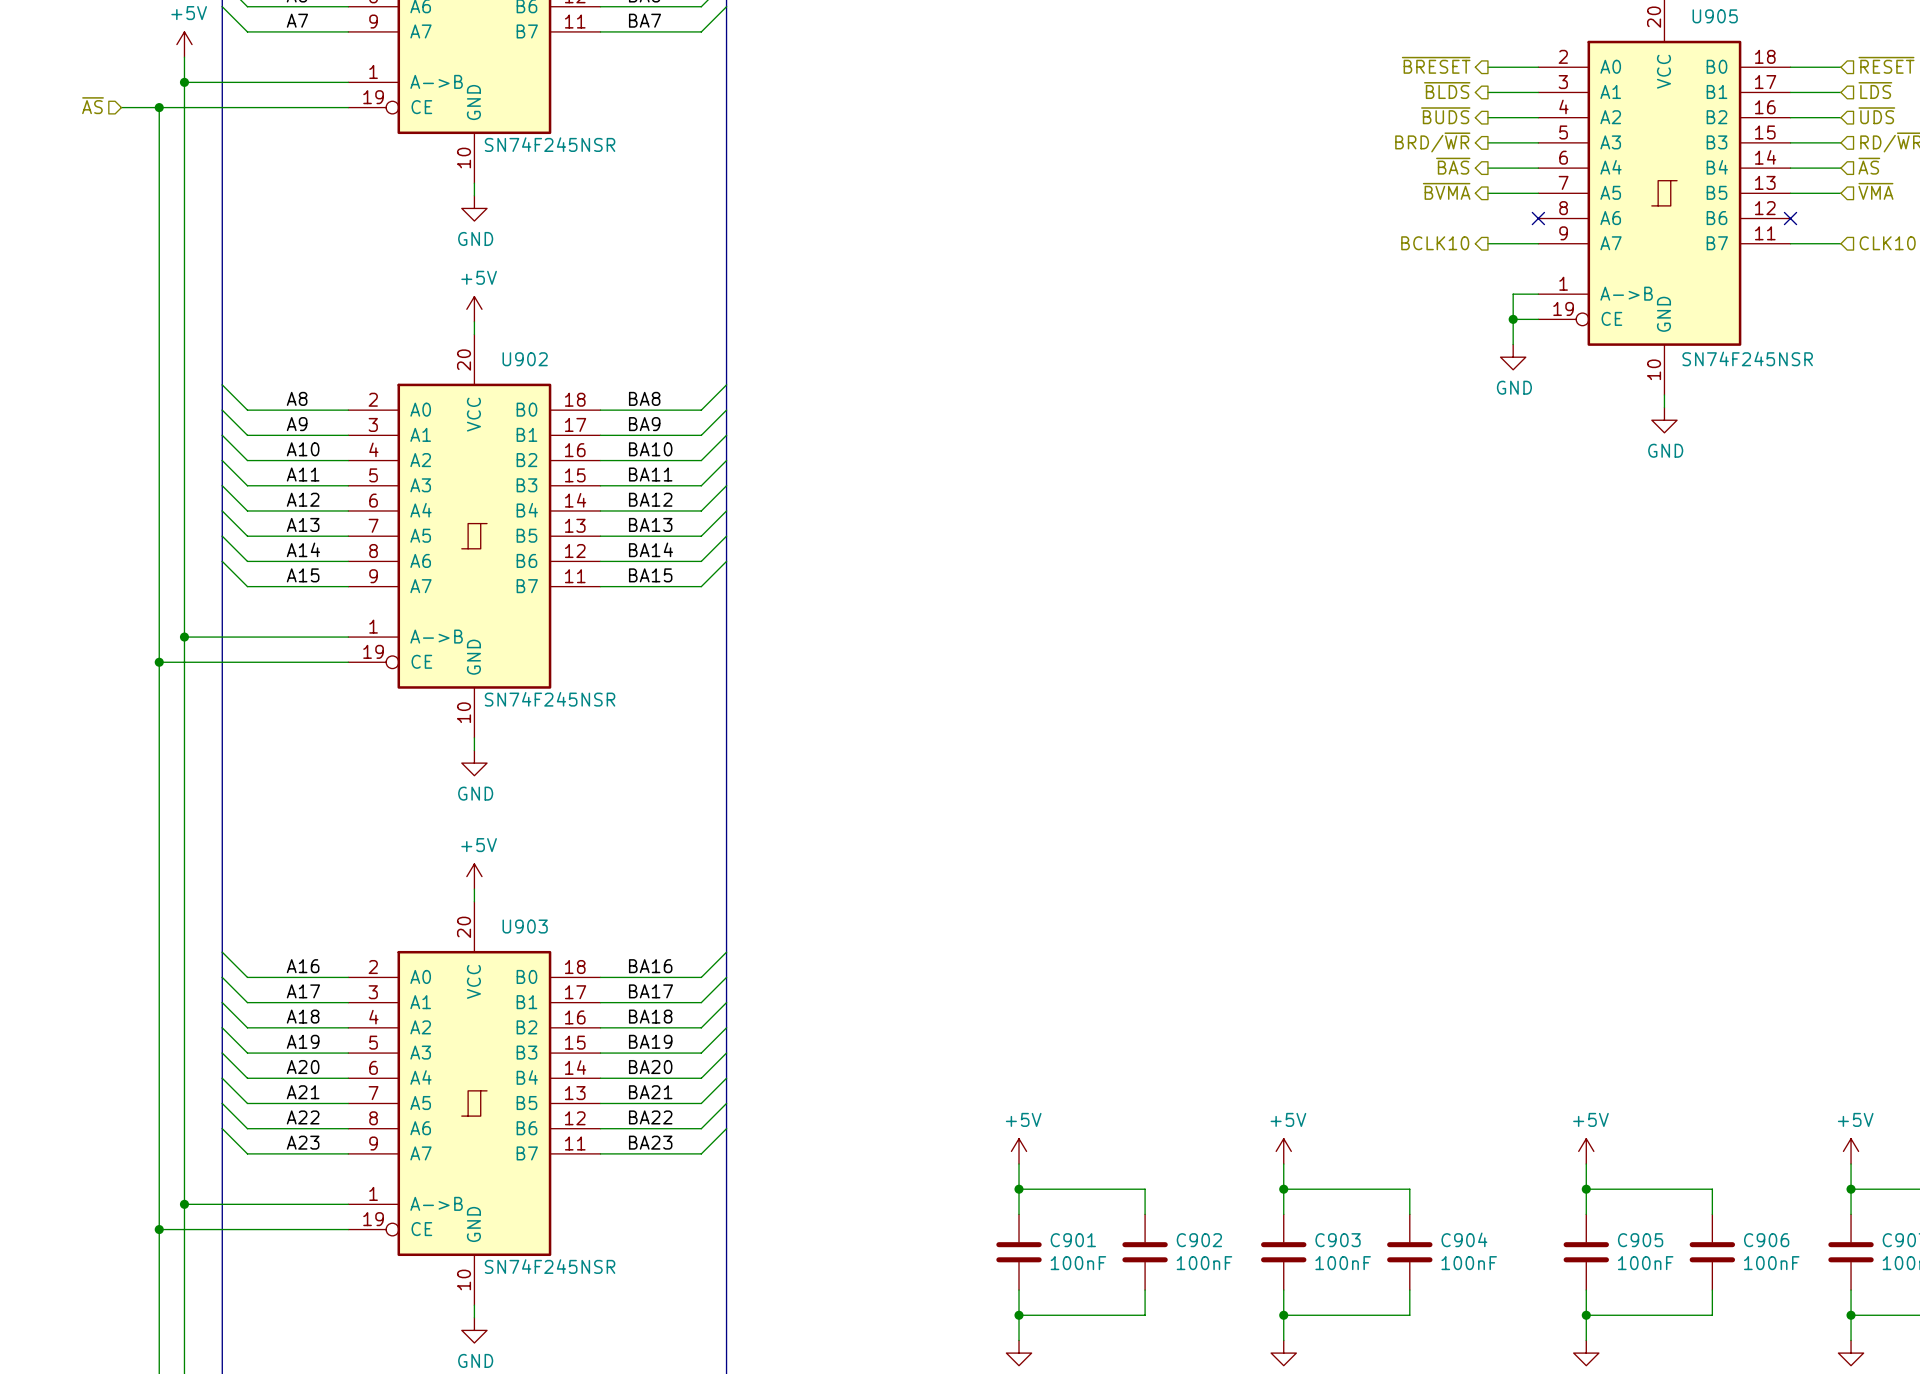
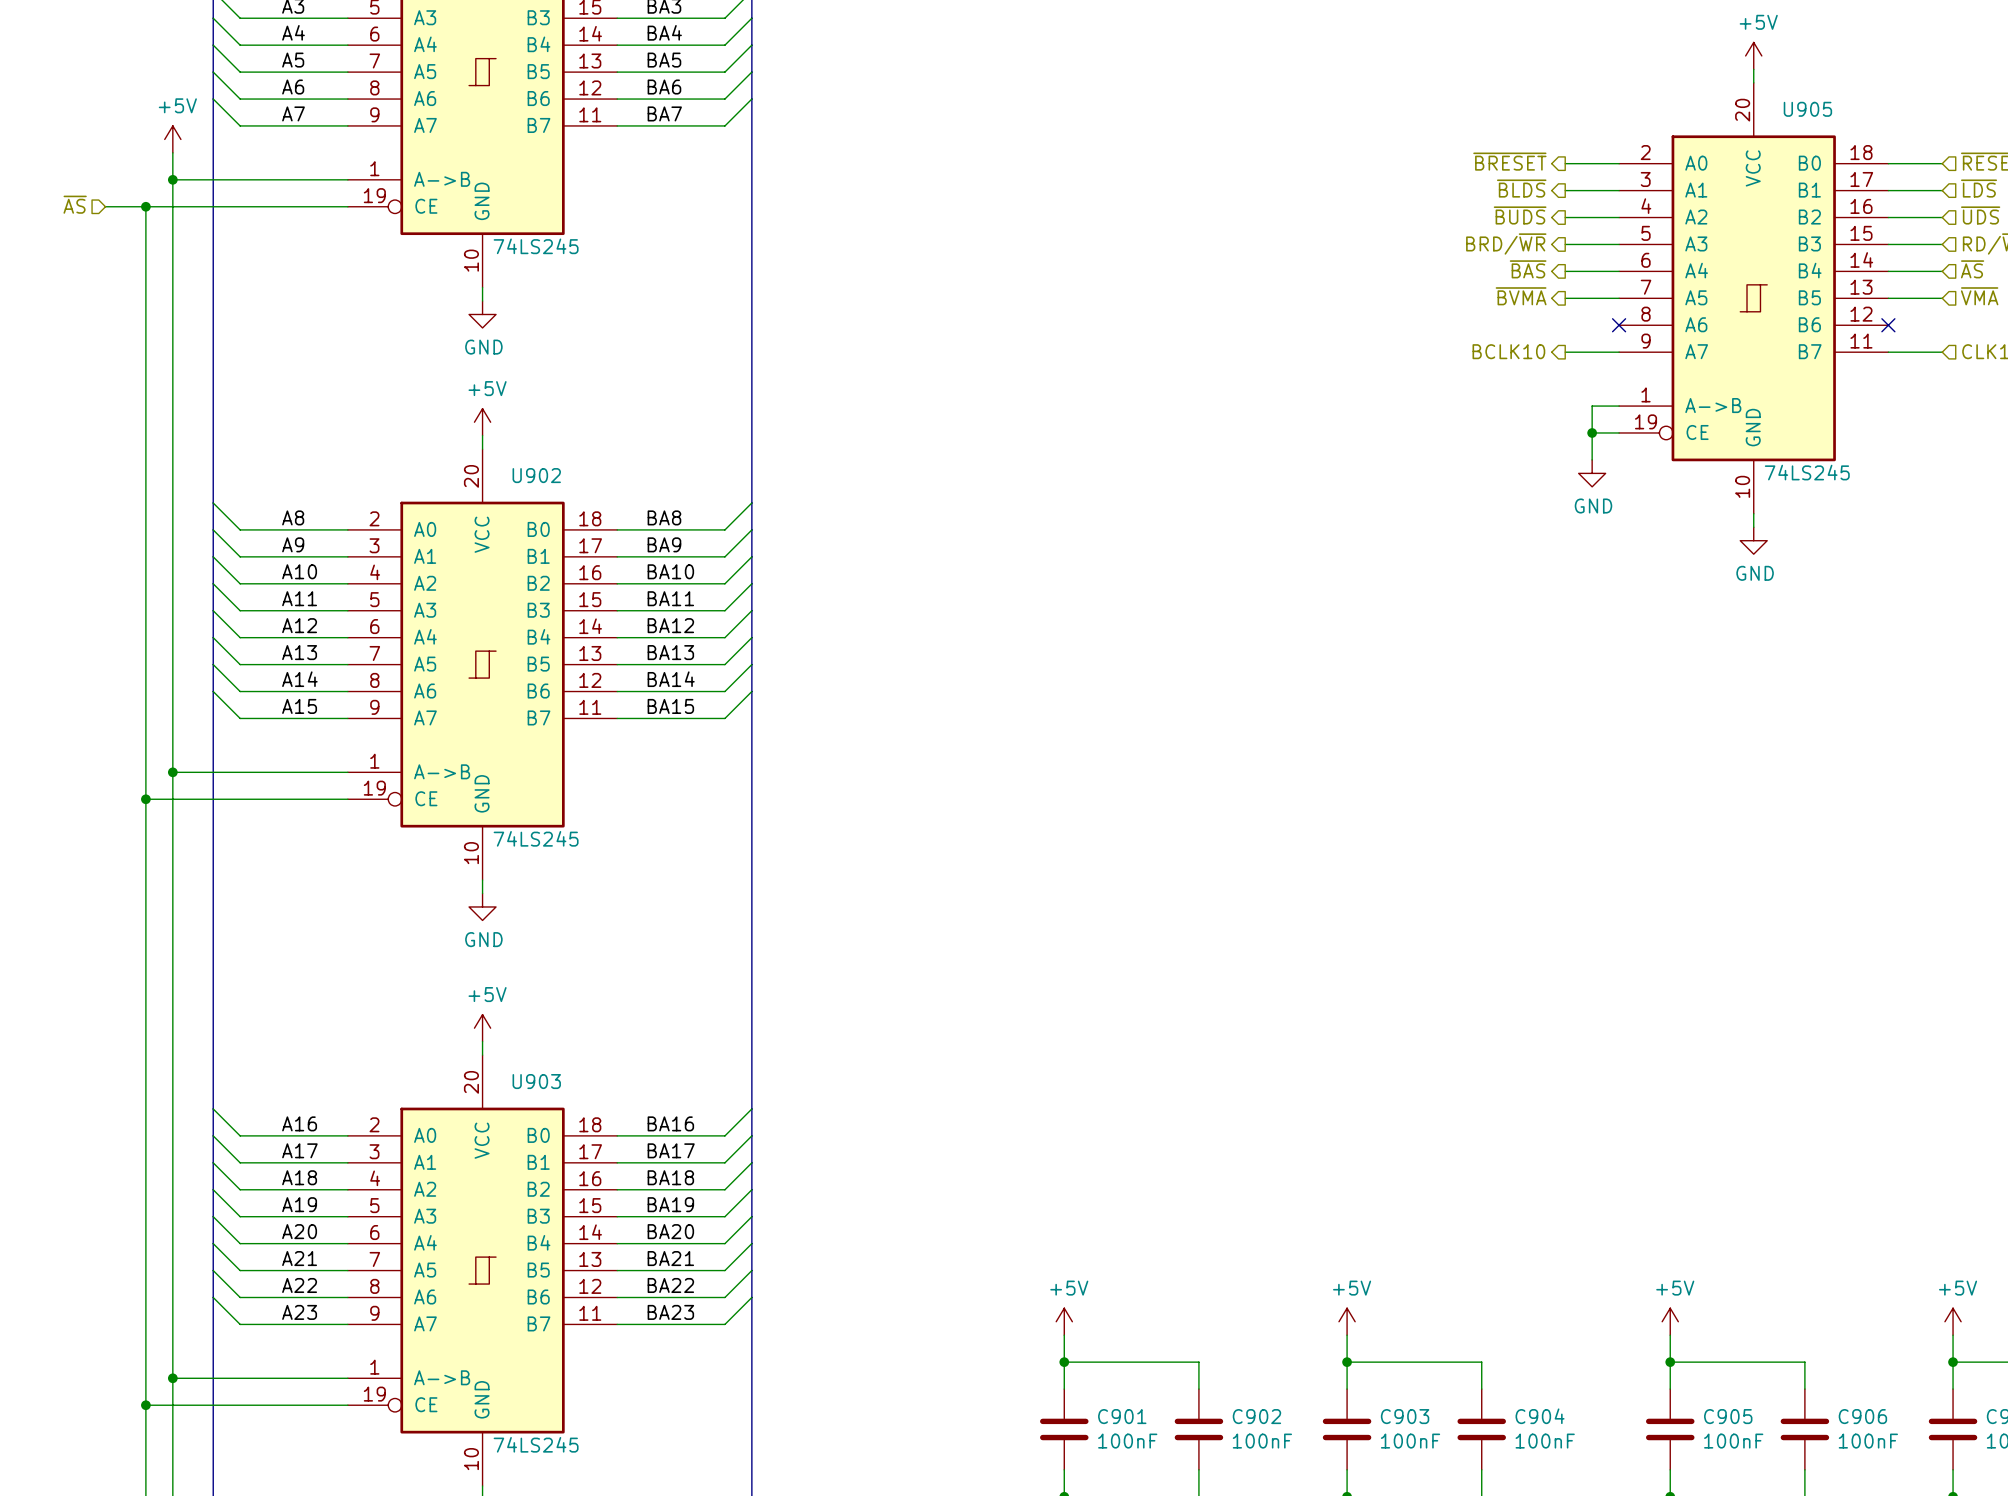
part value: SN74F245NSR (550, 144) -> 74LS245 (536, 246)
U905 value: SN74F245NSR (1747, 358) -> 74LS245 (1807, 472)
U902 value: SN74F245NSR (550, 699) -> 74LS245 (536, 838)
U903 value: SN74F245NSR (550, 1266) -> 74LS245 (536, 1444)

